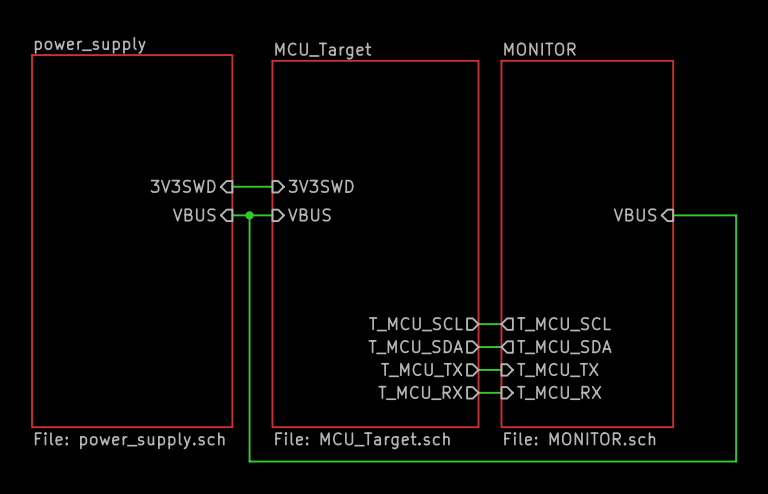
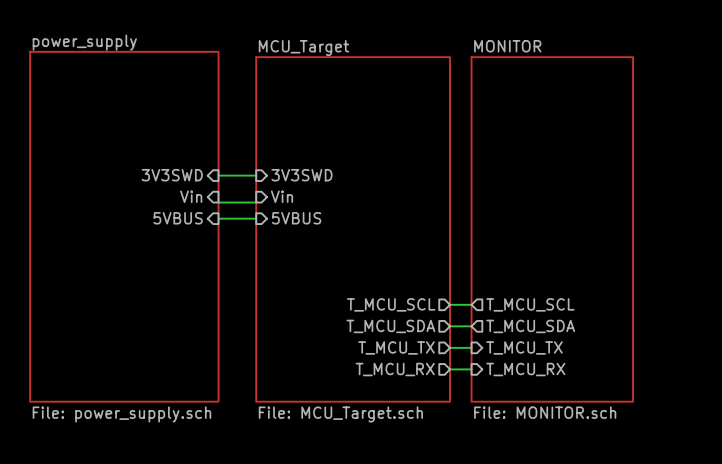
sheet pin: VBUS (194, 214) -> Vin (191, 196)
sheet pin: VBUS (309, 214) -> Vin (282, 196)
sheet pin: VBUS (635, 214) -> none
wire: (249, 215) (249, 461) (736, 461) (736, 215) (673, 215) -> none
junction: (249, 215) -> none
sheet pin: none -> 5VBUS (178, 218)
wire: none -> (218, 218) (256, 218)
sheet pin: none -> 5VBUS (296, 218)

